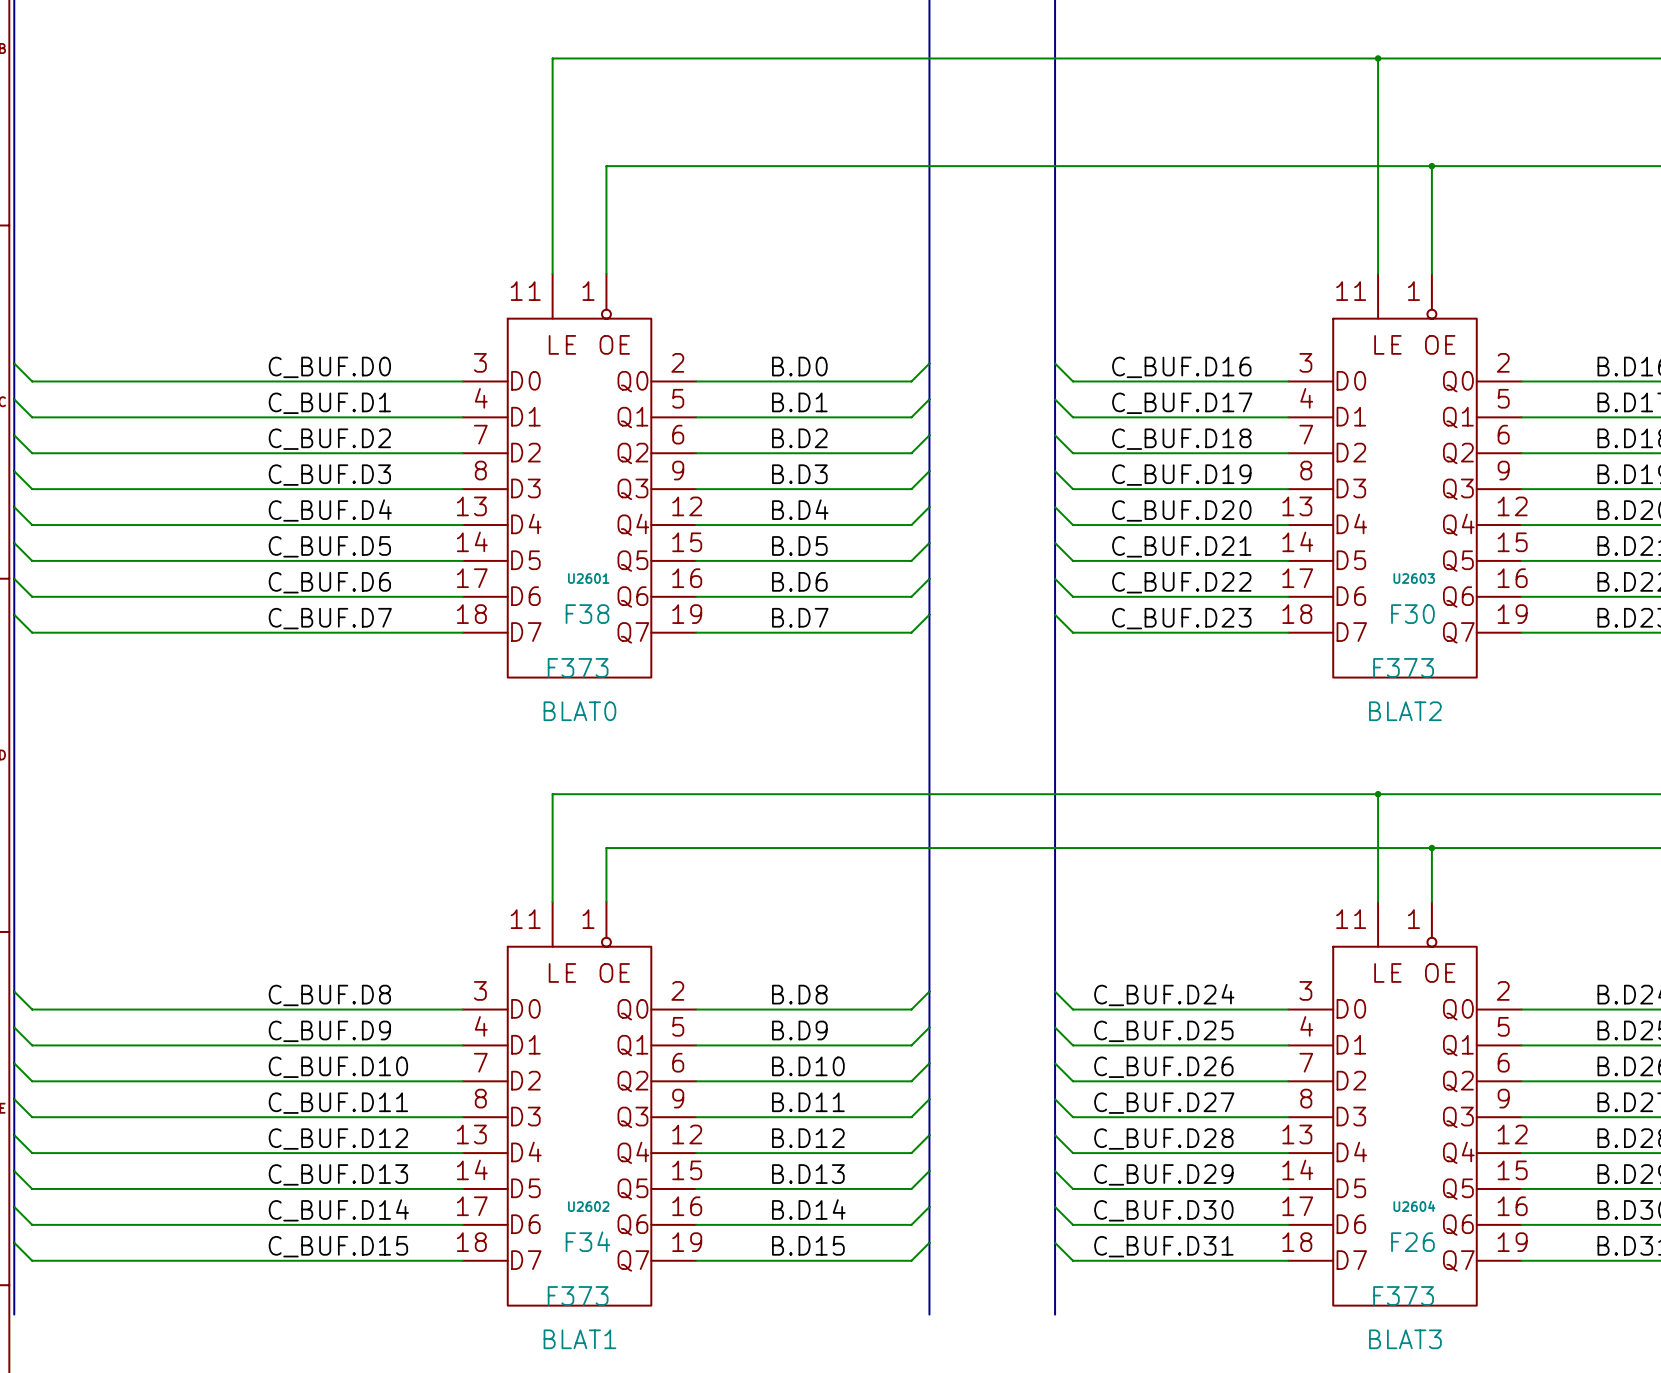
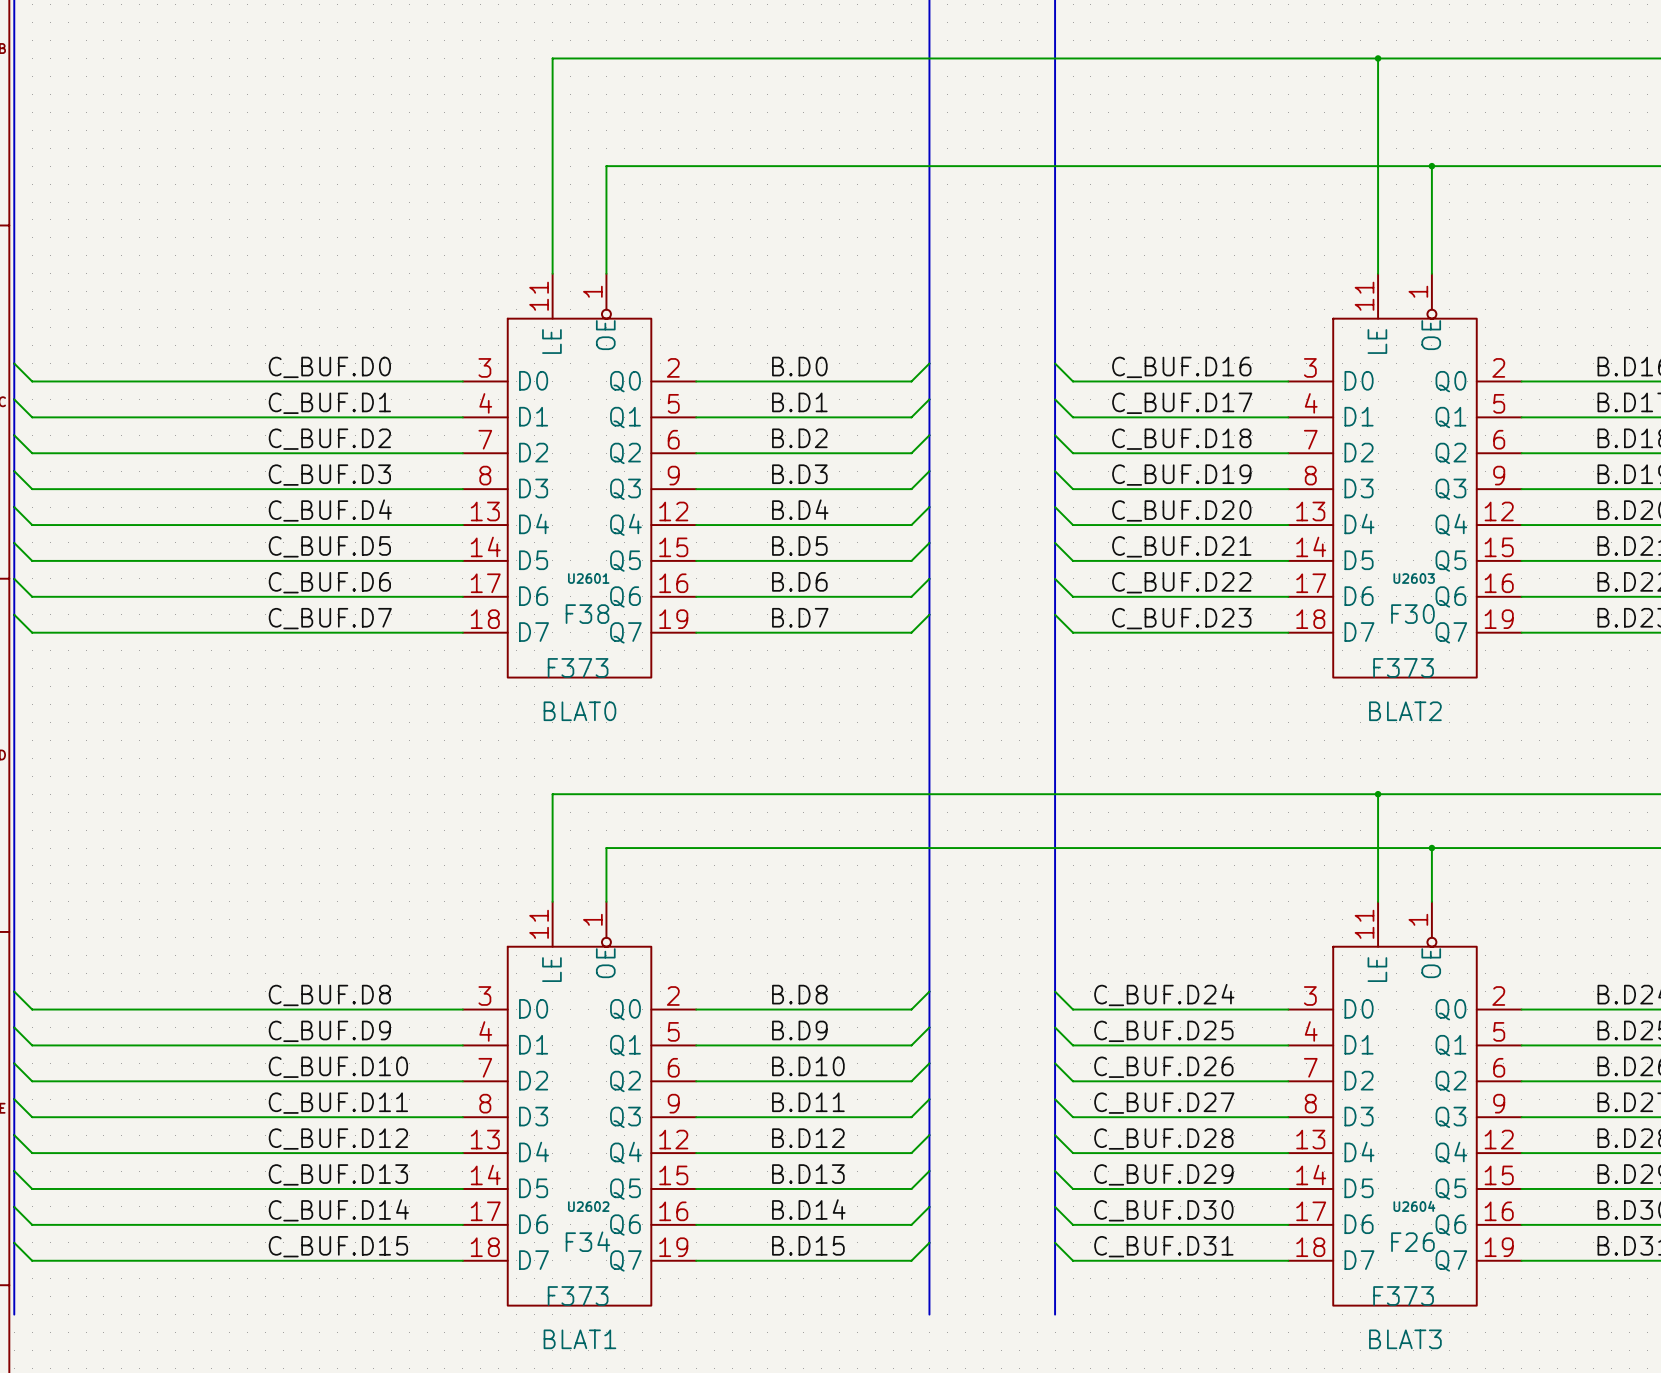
U2601 symbol: [462, 273, 697, 678] -> [462, 273, 697, 678]
U2603 symbol: [1288, 273, 1522, 678] -> [1288, 273, 1522, 678]
U2602 symbol: [462, 901, 697, 1306] -> [462, 901, 697, 1306]
U2604 symbol: [1288, 901, 1522, 1306] -> [1288, 901, 1522, 1306]

